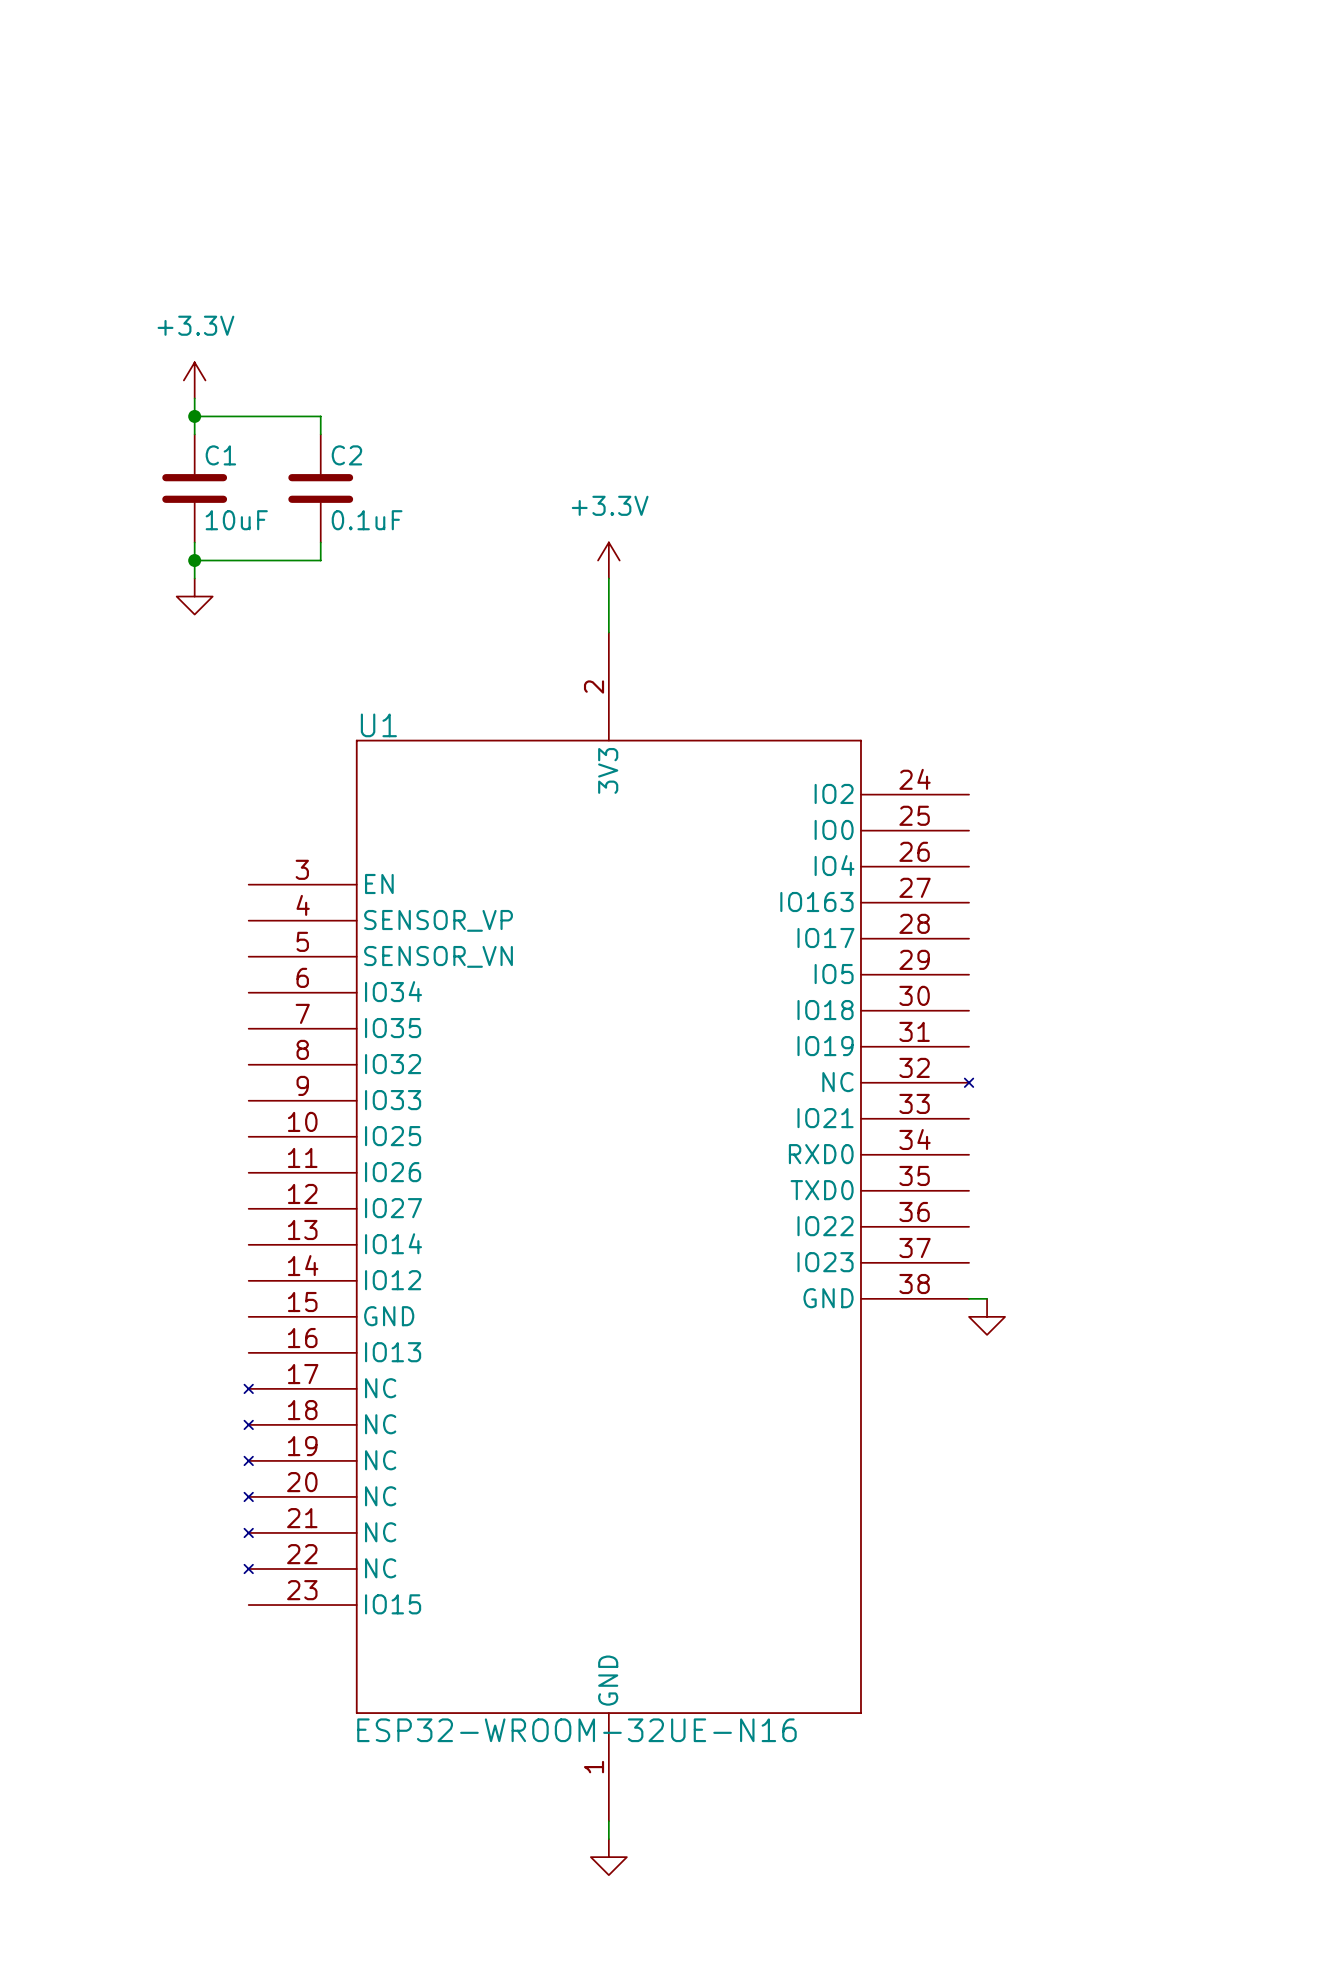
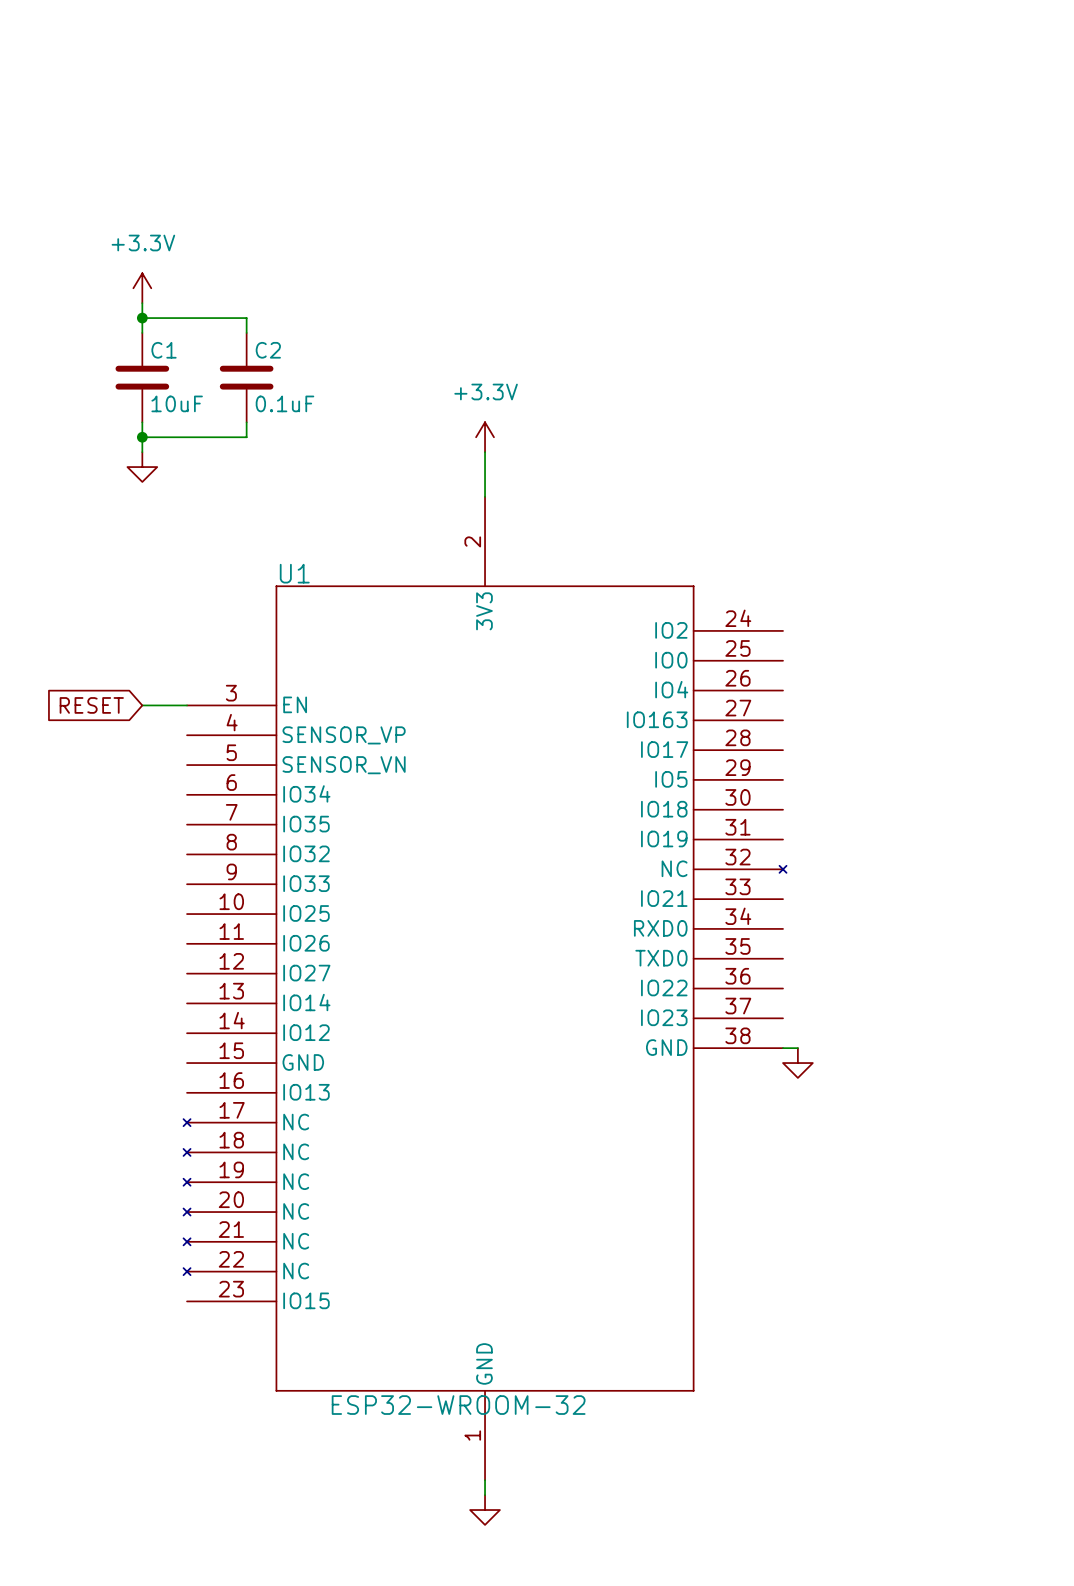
global label: none -> RESET (91, 705)
wire: none -> (142, 705) (187, 705)
U1 value: ESP32-WROOM-32UE-N16 (576, 1730) -> ESP32-WROOM-32 (458, 1405)

